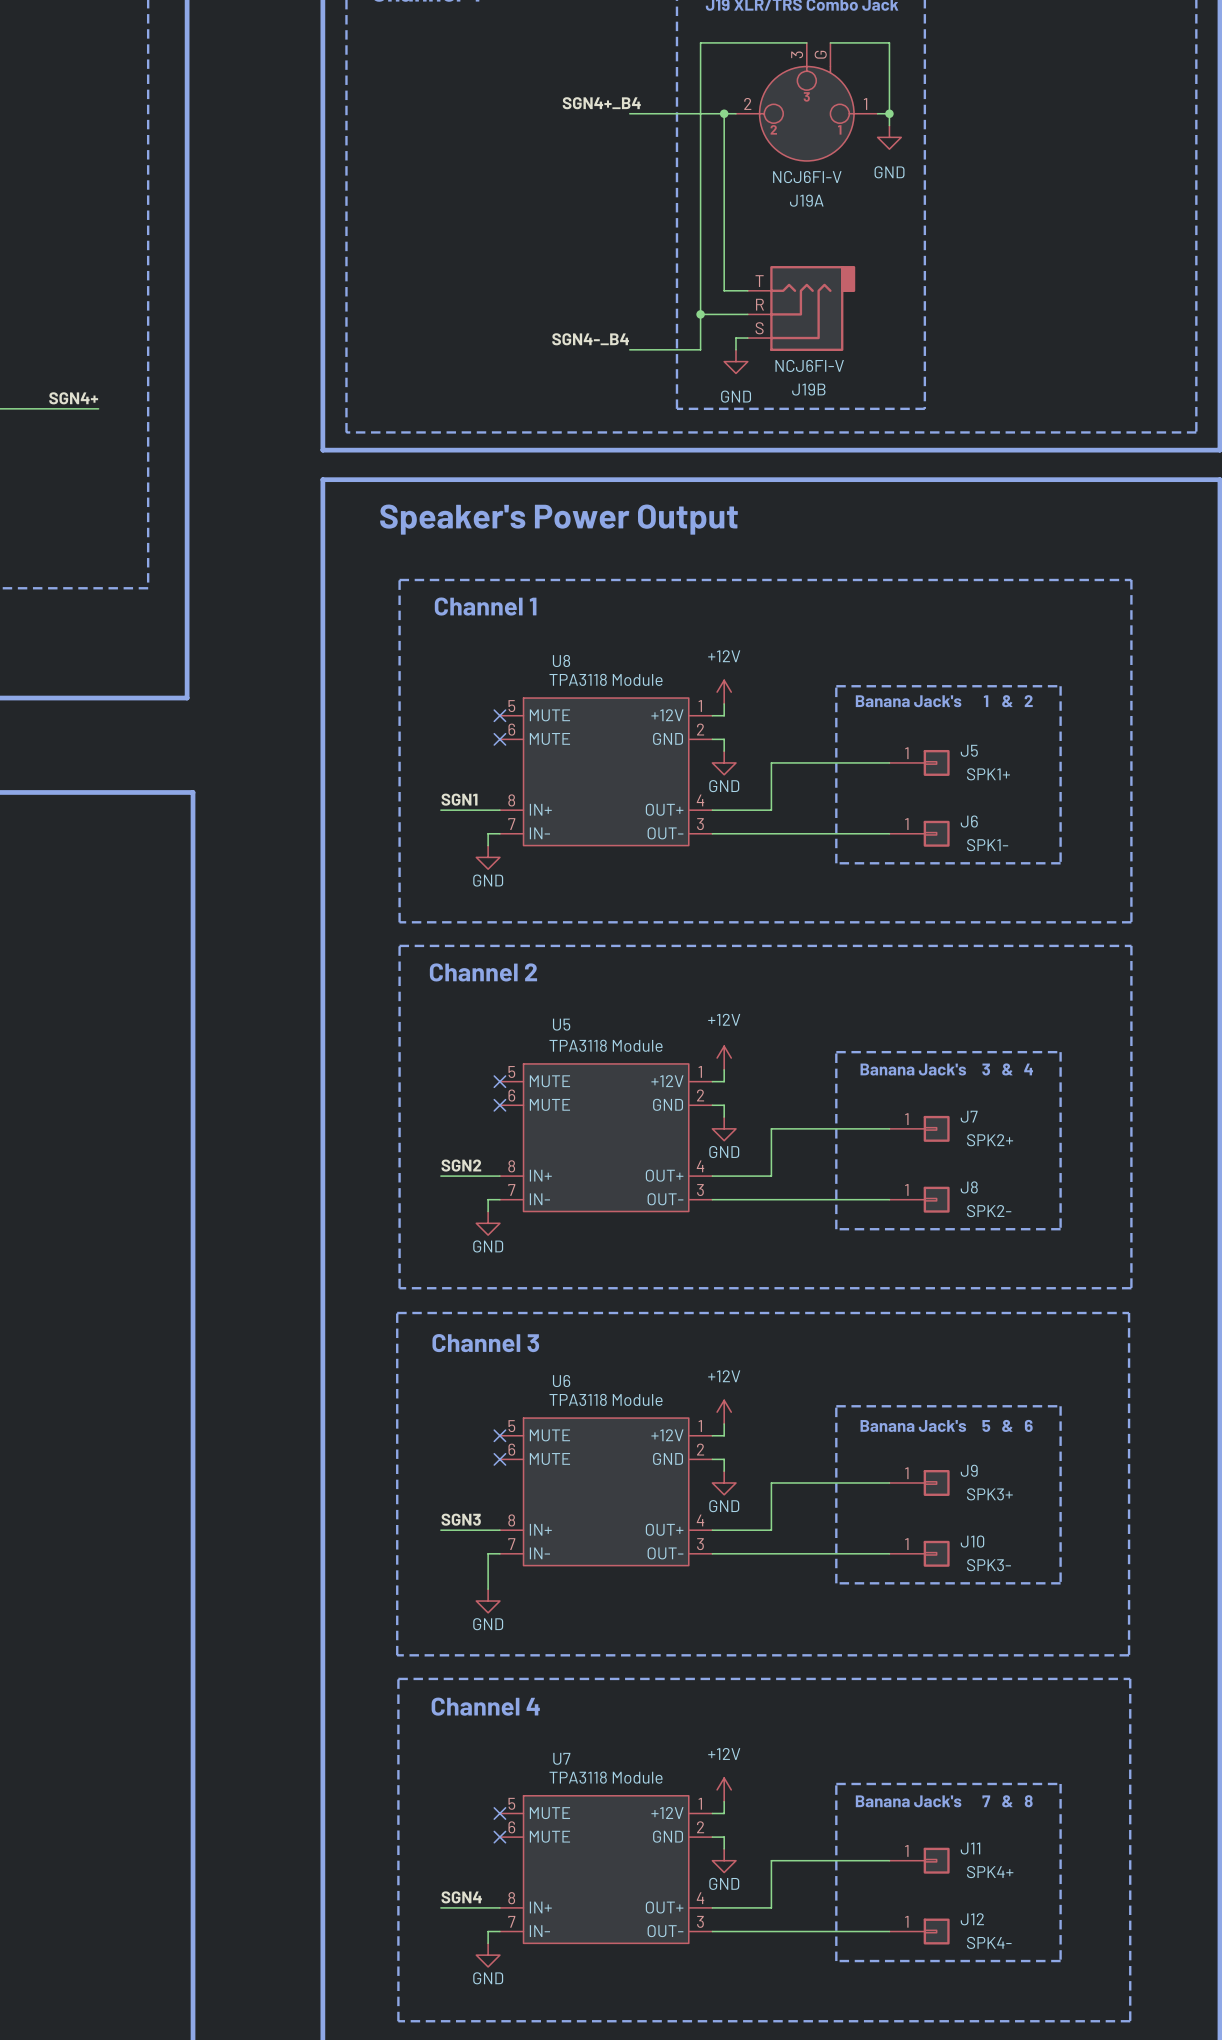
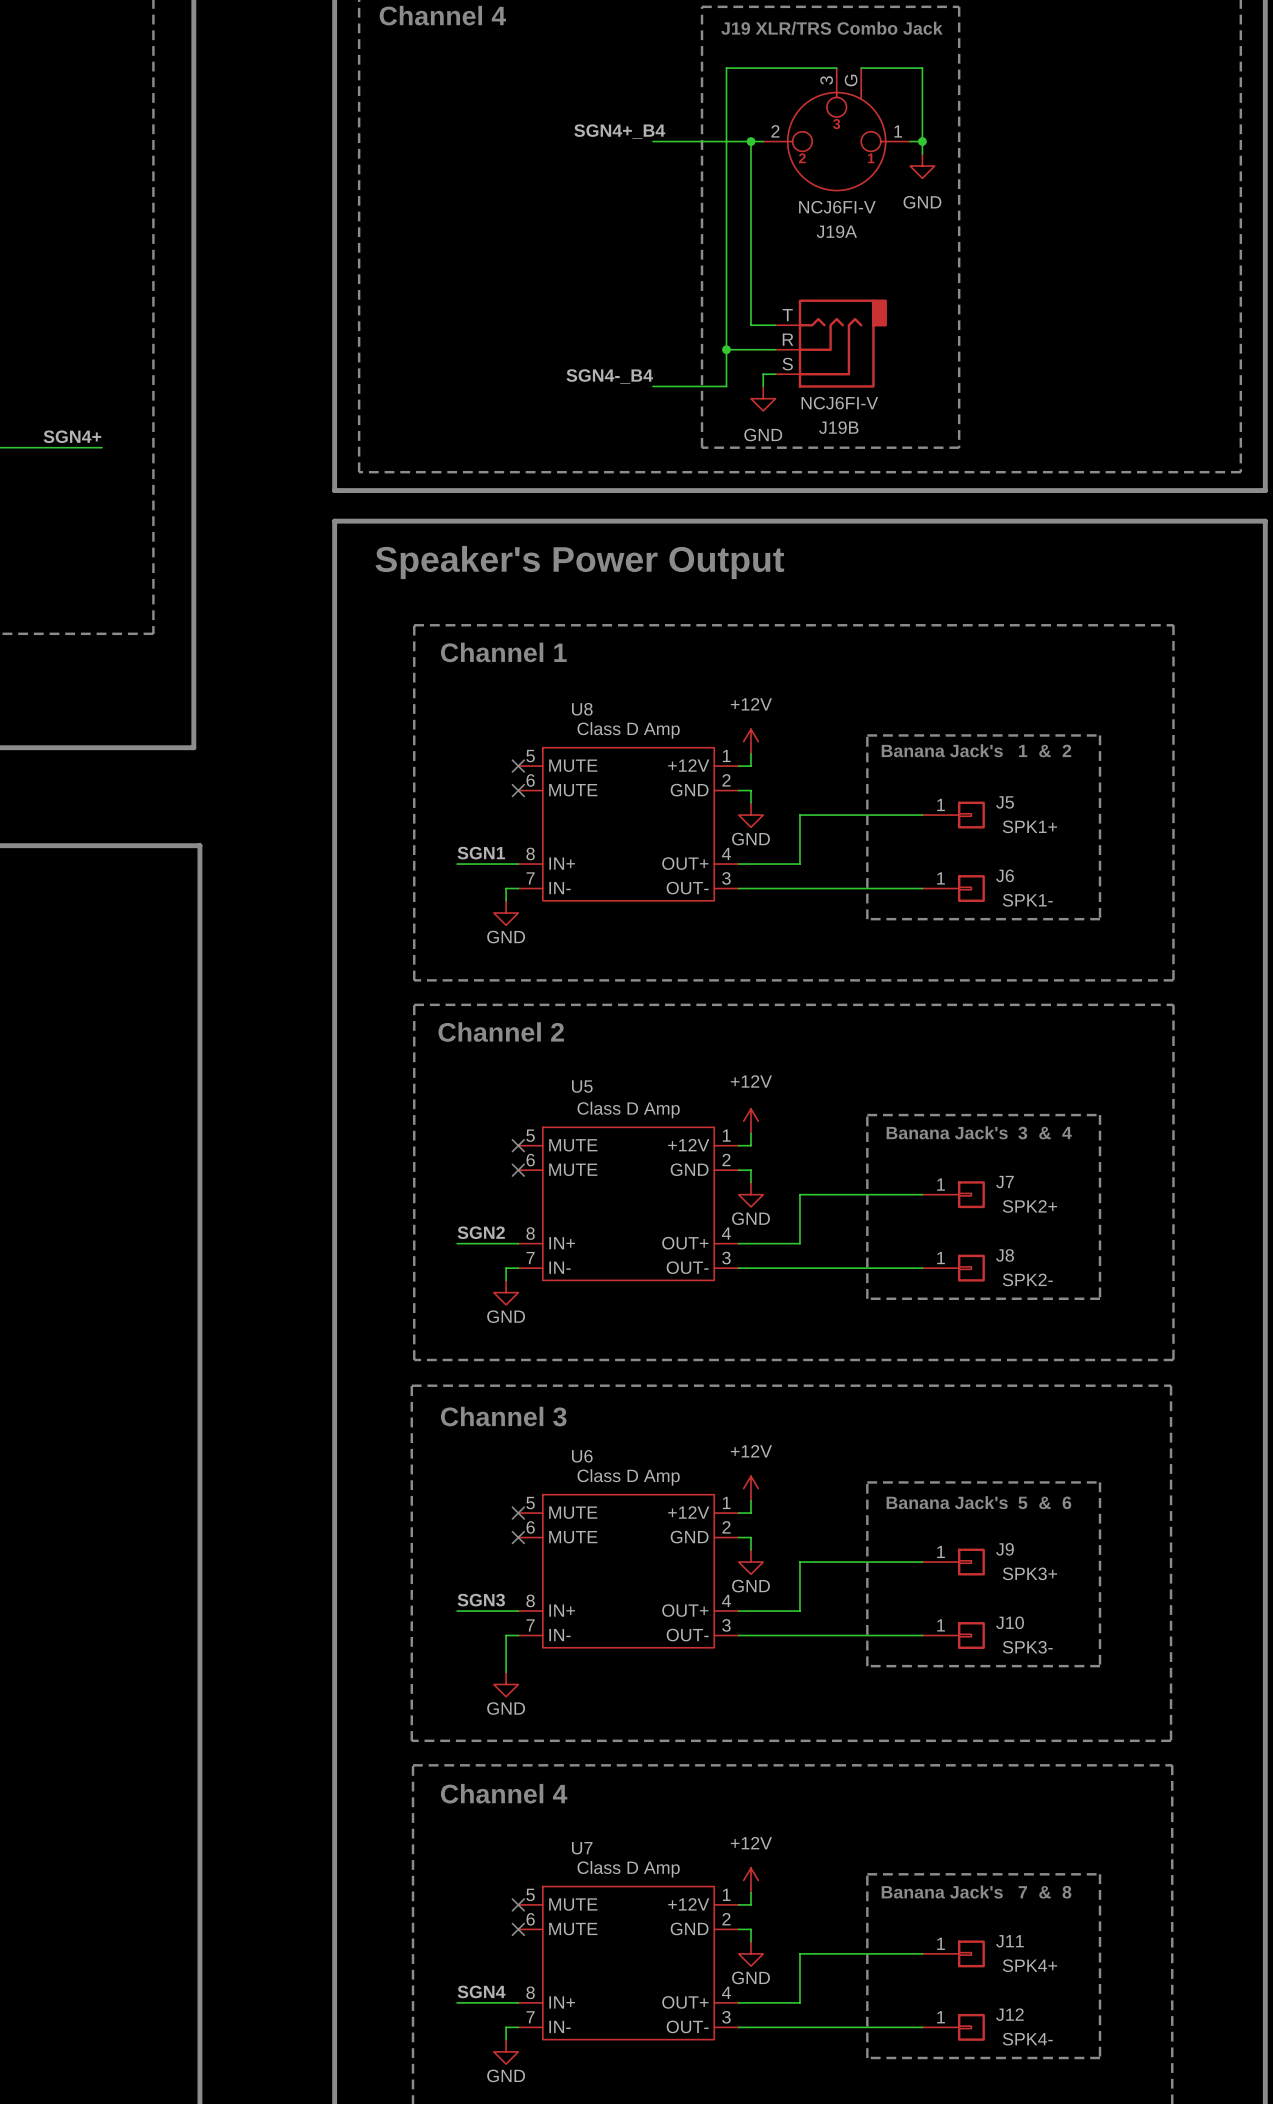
U8 value: TPA3118 Module (605, 679) -> Class D Amp (628, 730)
U5 value: TPA3118 Module (605, 1045) -> Class D Amp (628, 1110)
U6 value: TPA3118 Module (605, 1399) -> Class D Amp (628, 1477)
U7 value: TPA3118 Module (605, 1777) -> Class D Amp (628, 1869)

